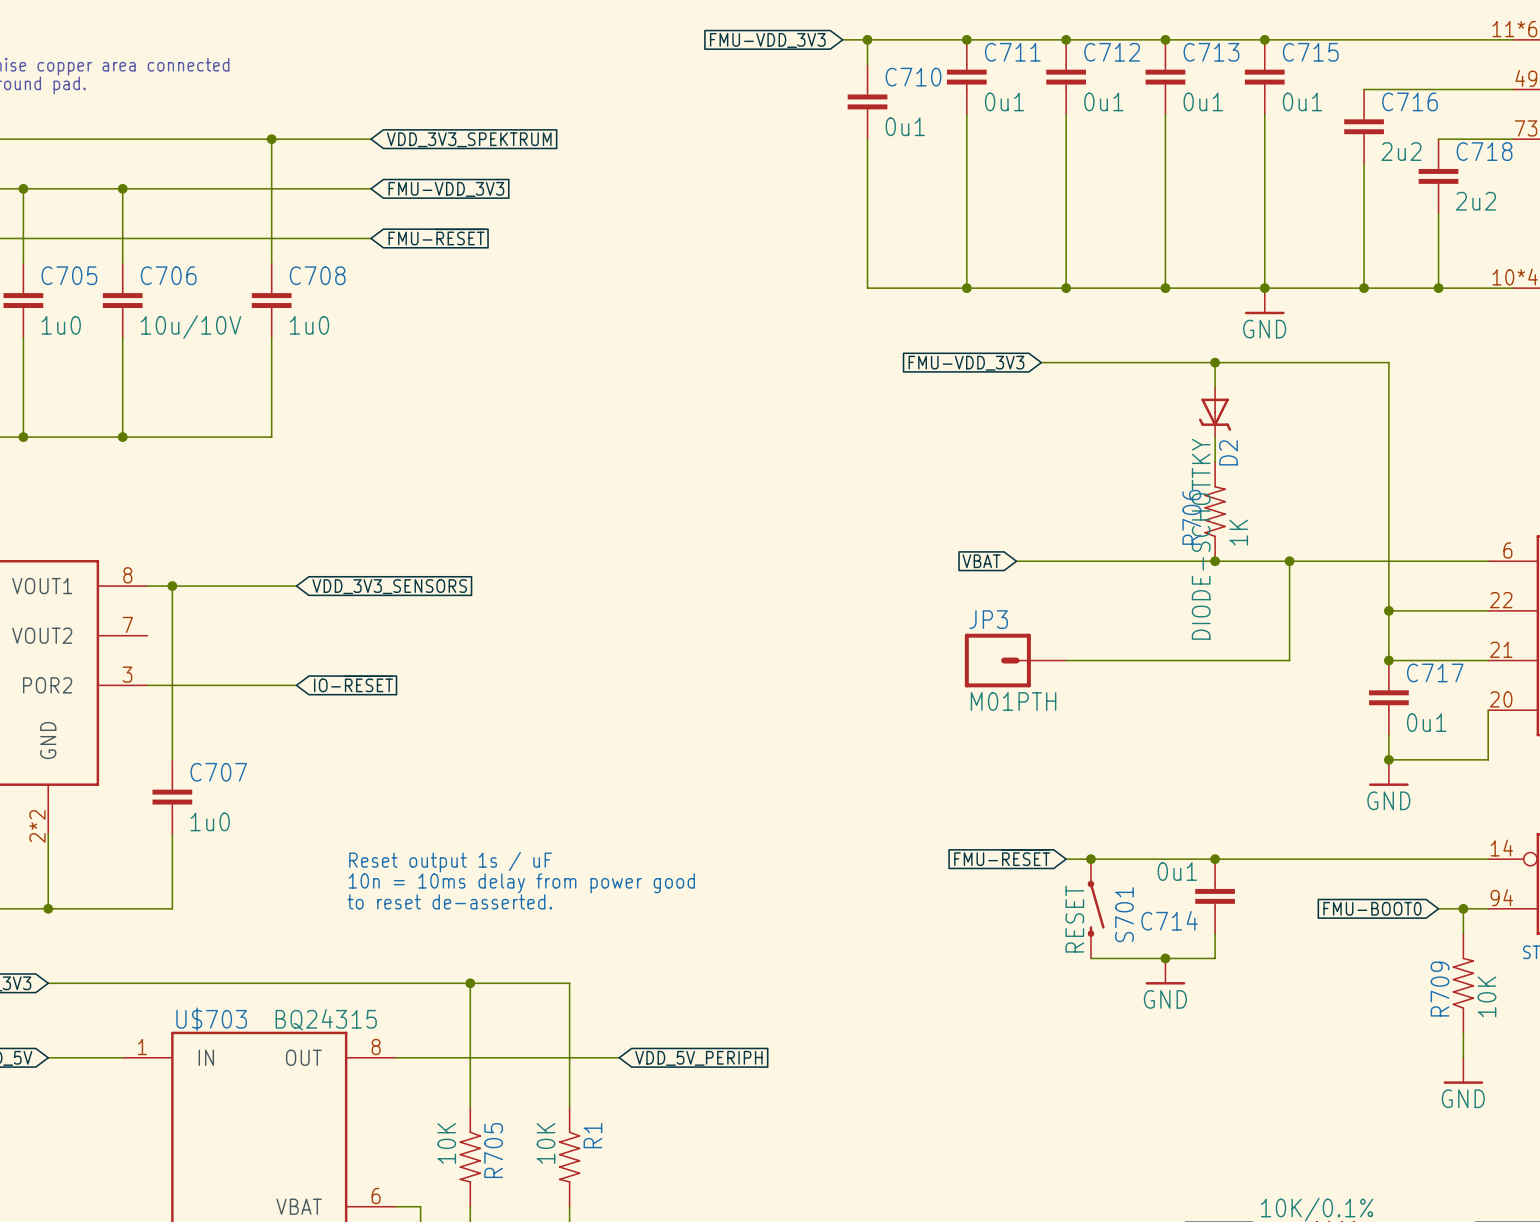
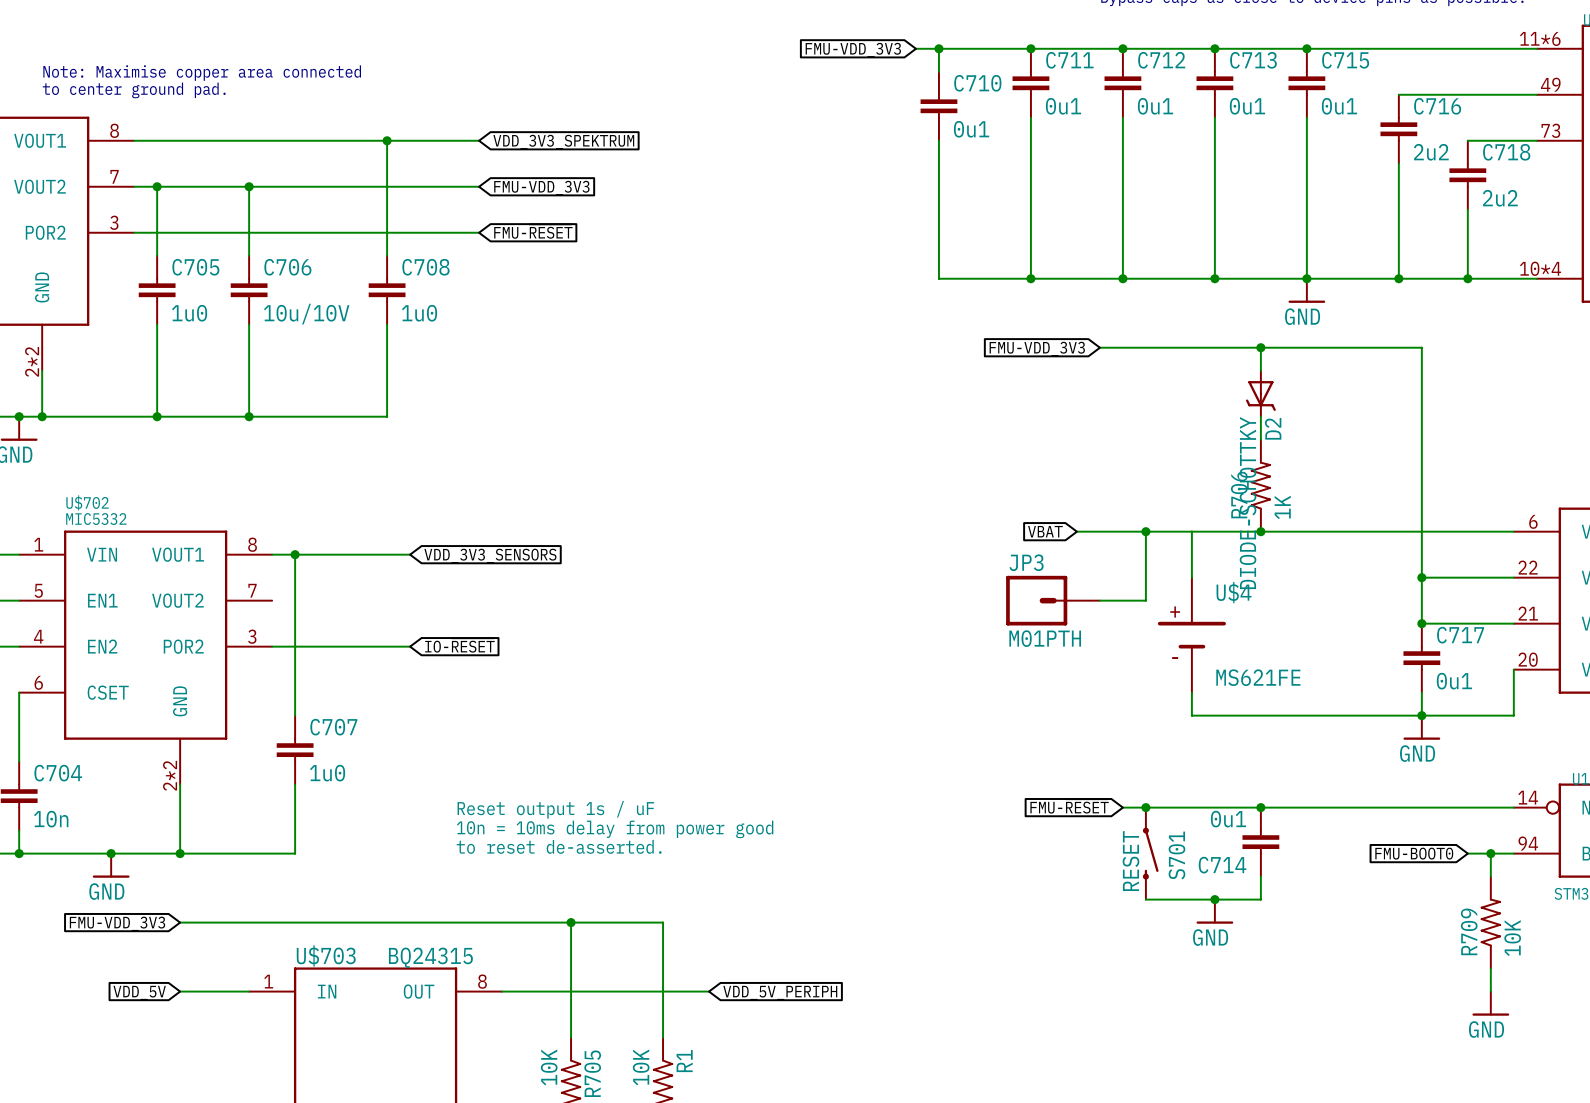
wire: none -> (1145, 531) (1145, 600) (1099, 600)
junction: none -> (1145, 531)
wire: none -> (1191, 531) (1191, 577)
wire: (1289, 561) (1289, 660) (1066, 660) -> none
junction: (1289, 561) -> none
JP3 position: (1015, 660) -> (1053, 600)
U$4: none -> MS621FE (1191, 635)
wire: none -> (1191, 692) (1191, 715) (1421, 715)

